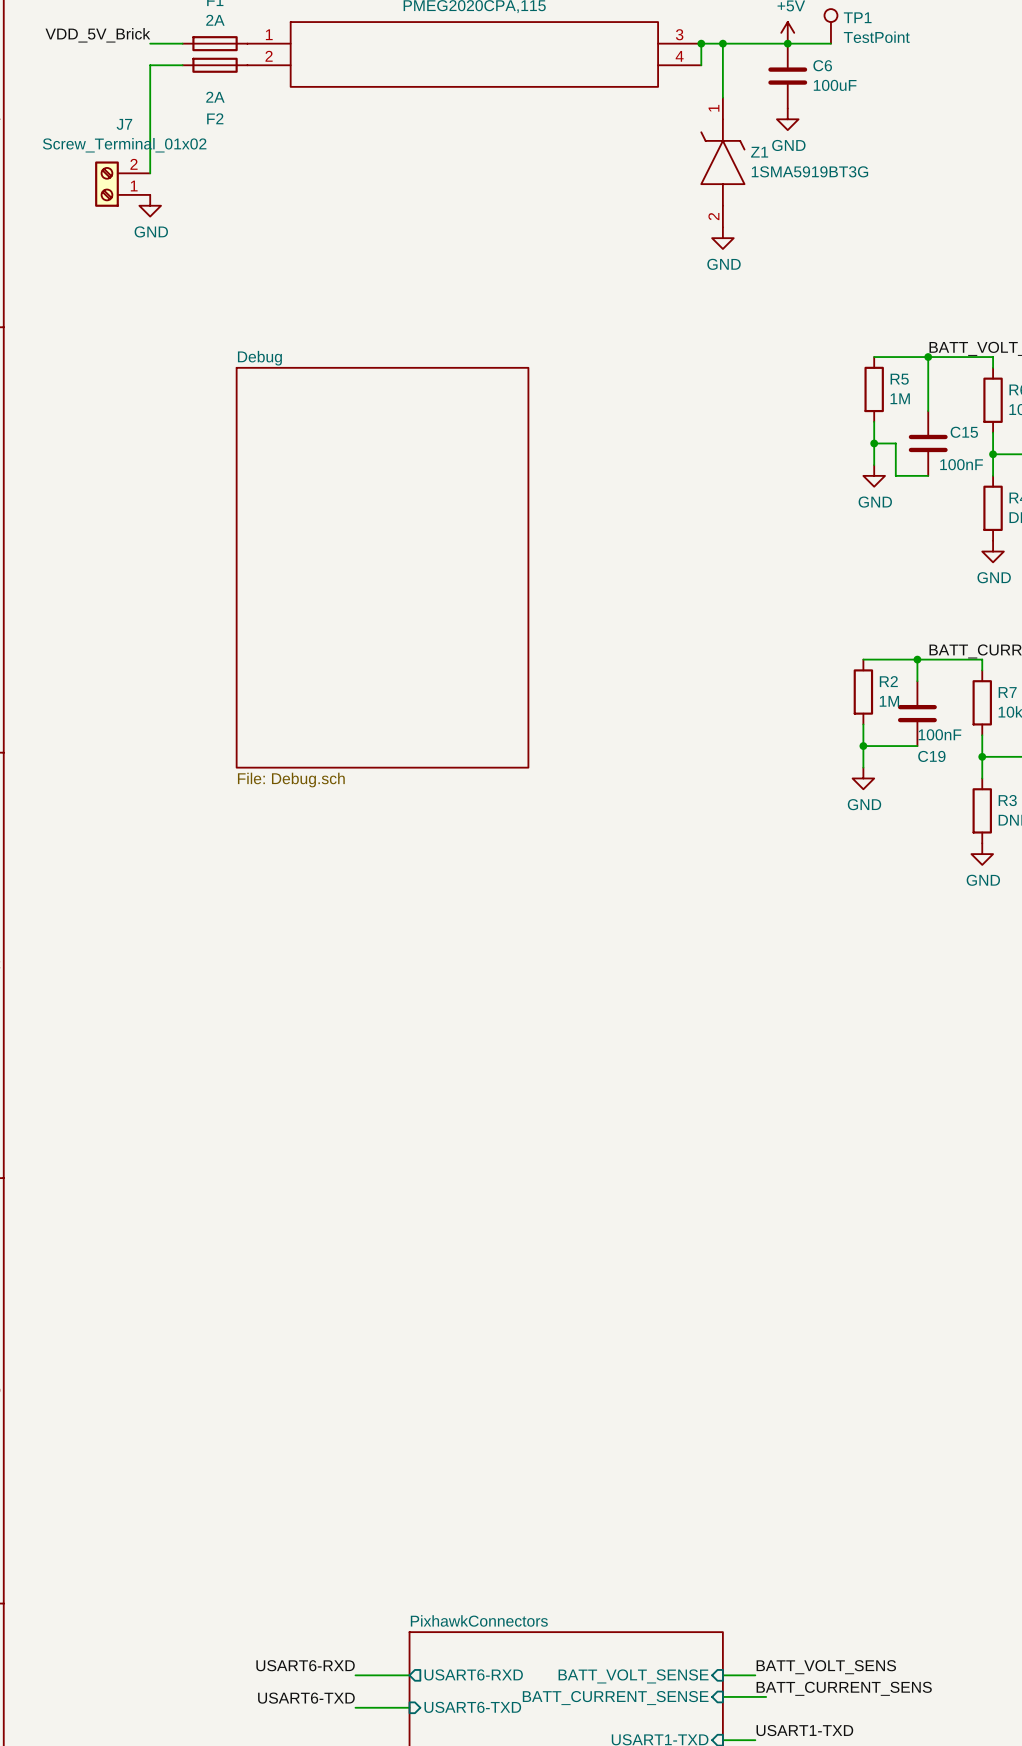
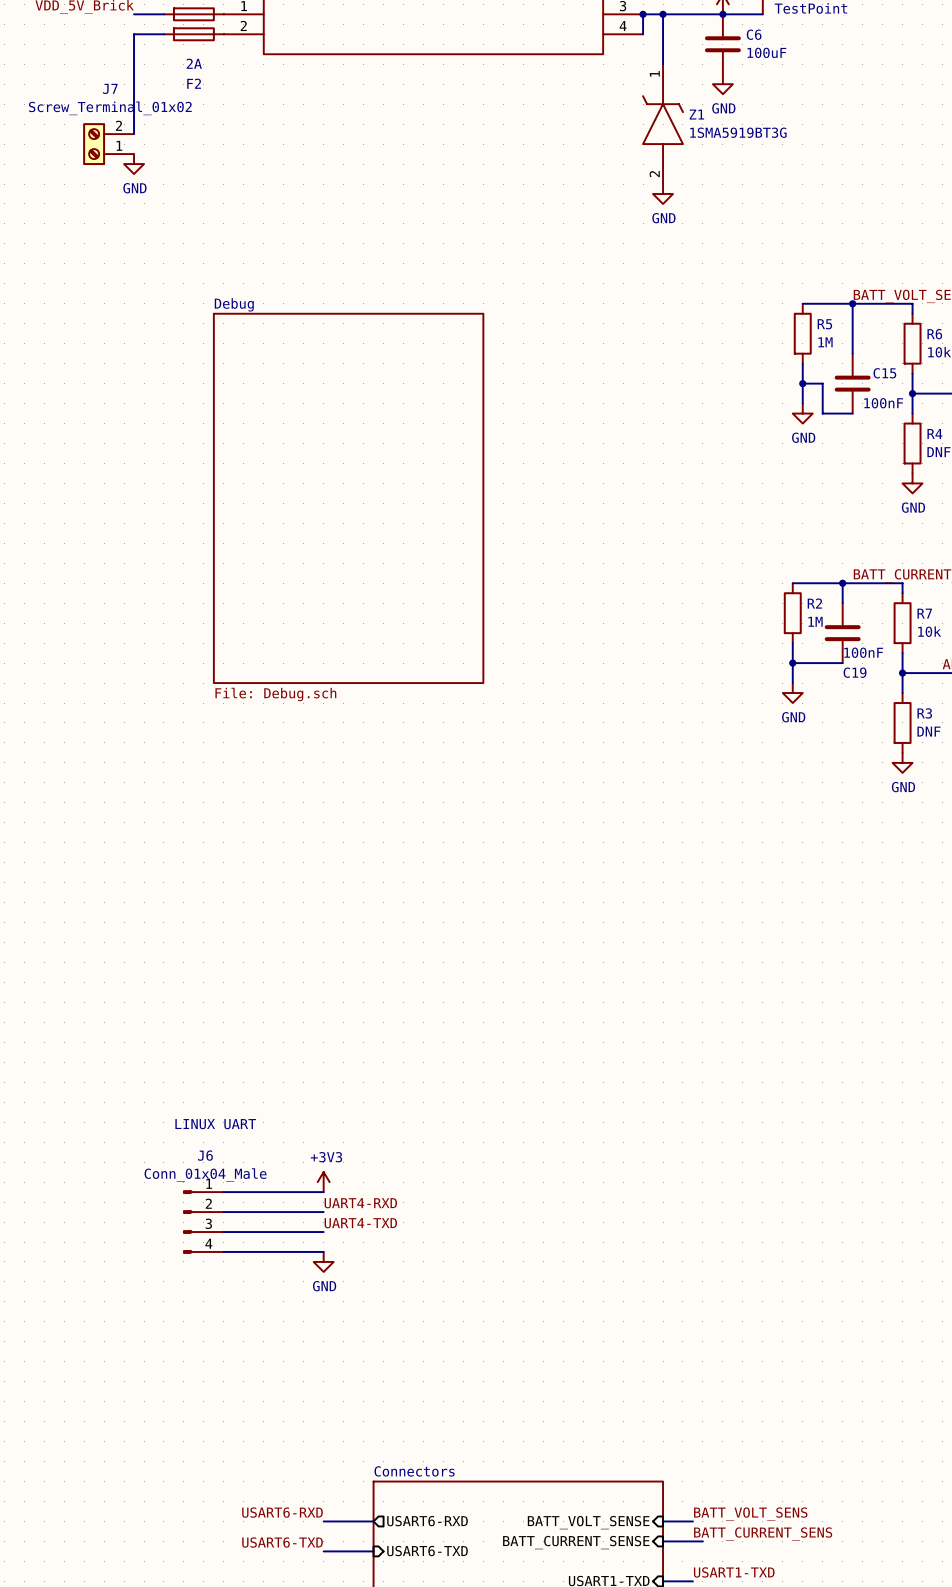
text: none -> LINUX UART (215, 1124)
power symbol: none -> +3V3 (323, 1182)
wire: none -> (223, 1192) (323, 1192)
label: none -> UART4-RXD (360, 1203)
wire: none -> (223, 1212) (323, 1212)
J6: none -> Conn_01x04_Male (203, 1222)
label: none -> UART4-TXD (360, 1223)
wire: none -> (223, 1232) (323, 1232)
wire: none -> (223, 1251) (323, 1251)
power symbol: none -> GND (323, 1261)
sheet PixhawkConnectors name: PixhawkConnectors (479, 1620) -> Connectors (414, 1471)

